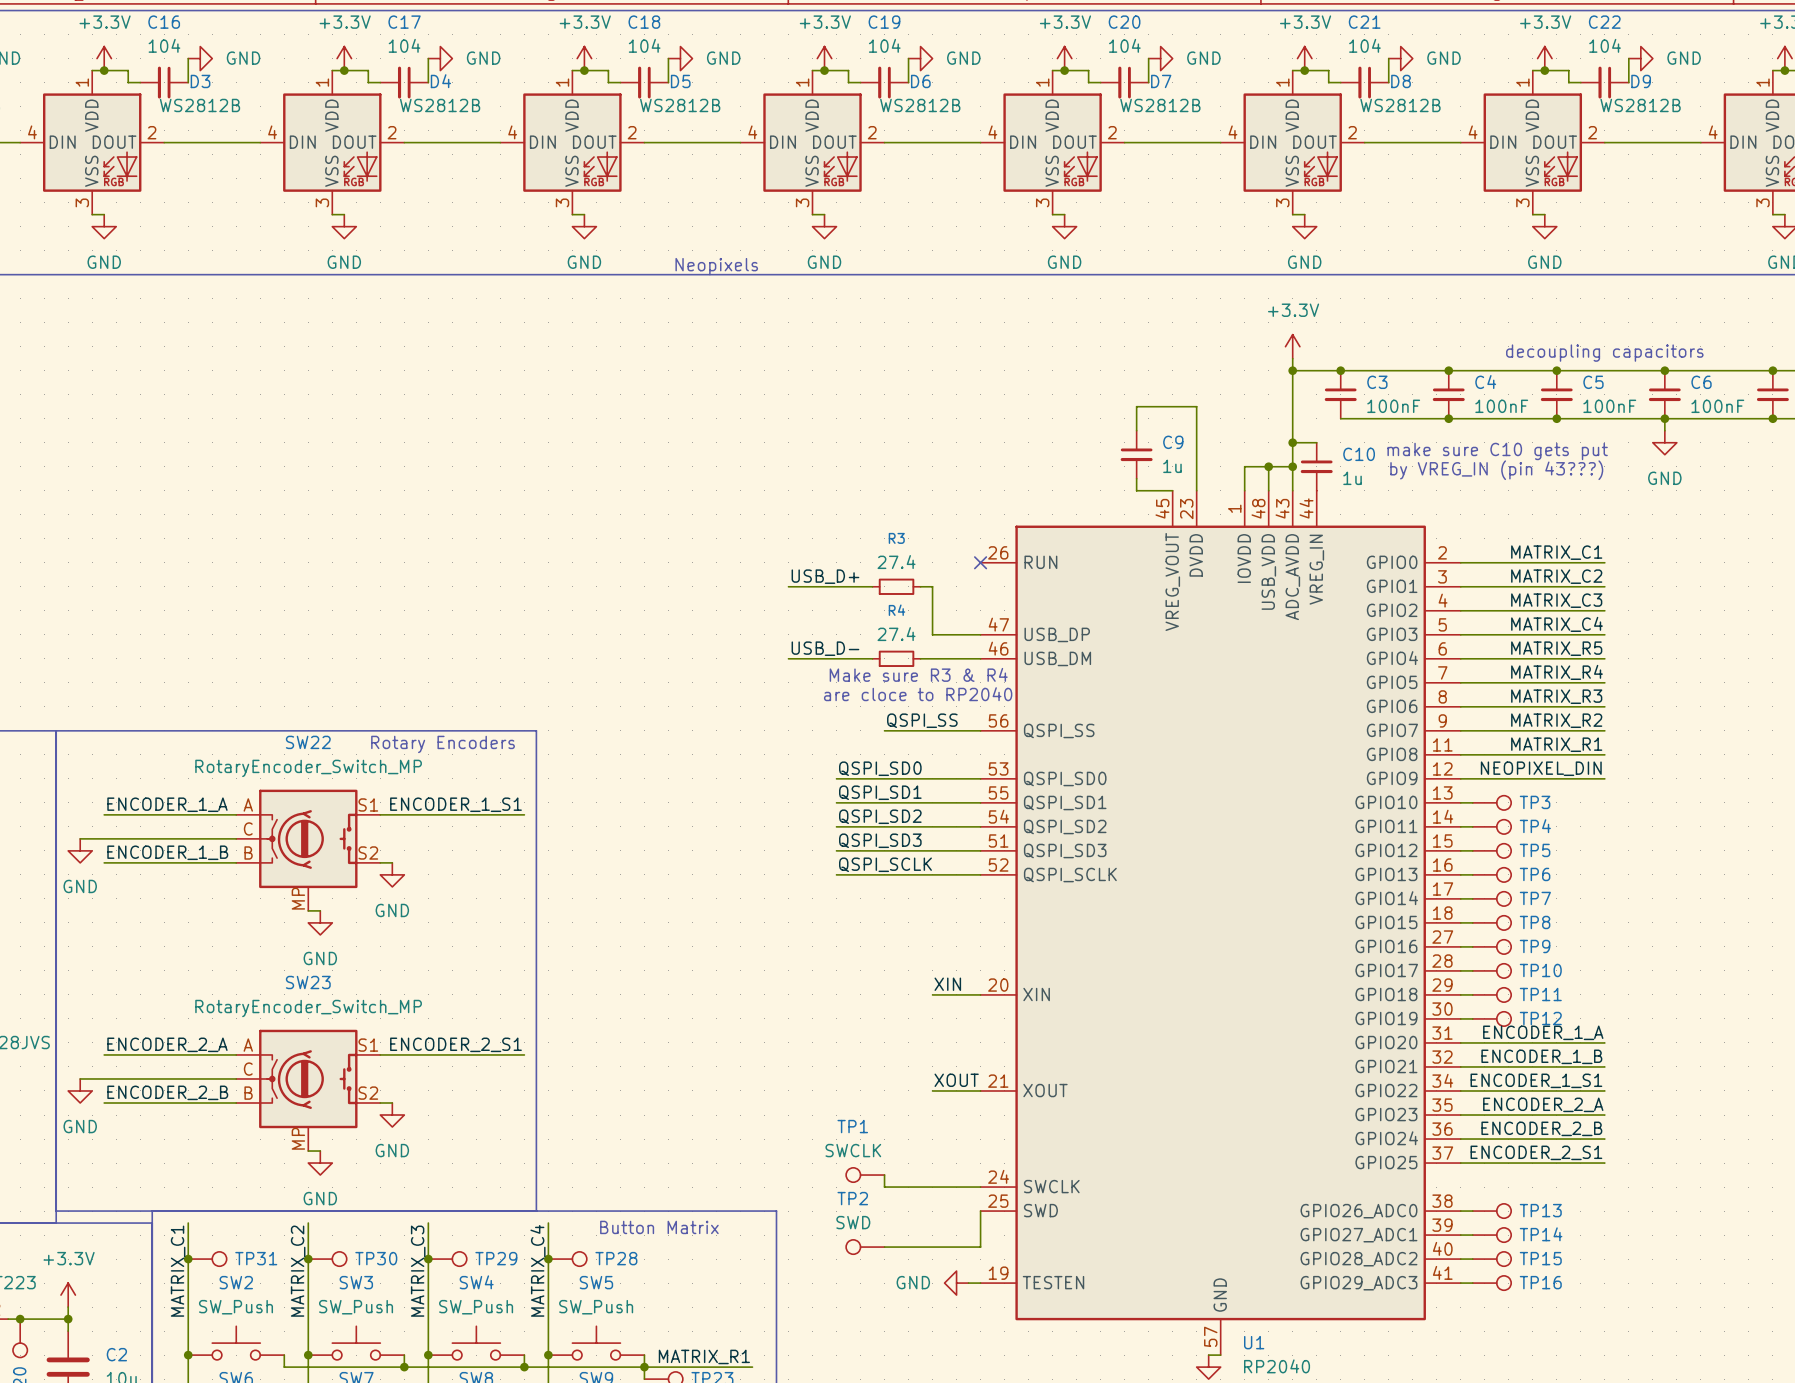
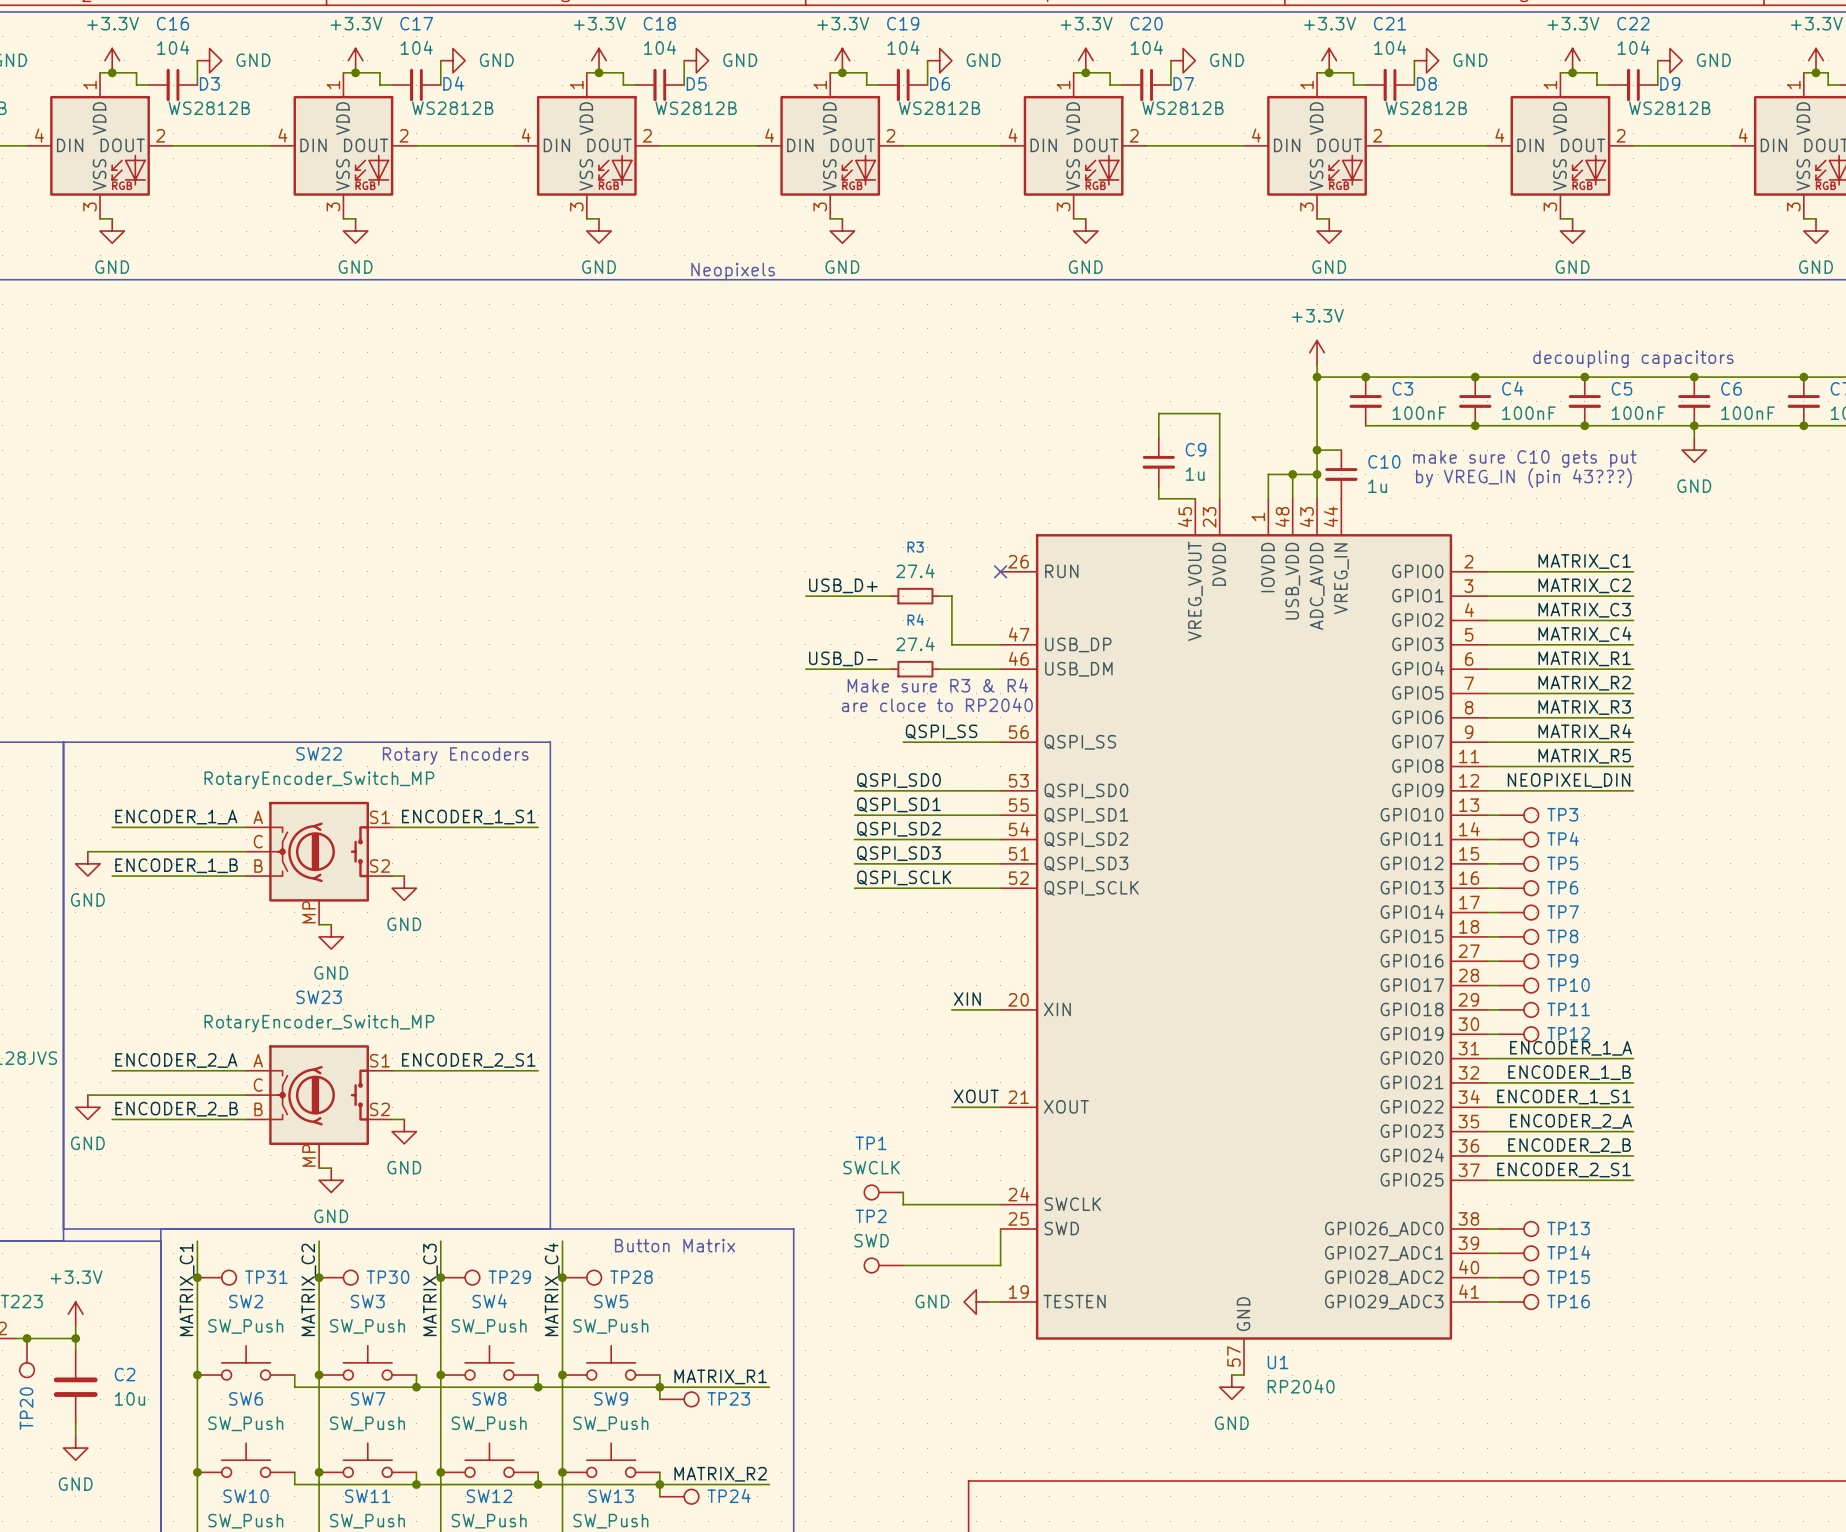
label: MATRIX_R5 (1556, 648) -> MATRIX_R1 (1584, 658)
label: MATRIX_R4 (1557, 672) -> MATRIX_R2 (1584, 683)
label: MATRIX_R2 (1556, 720) -> MATRIX_R4 (1584, 731)
label: MATRIX_R1 (1556, 744) -> MATRIX_R5 (1584, 756)

